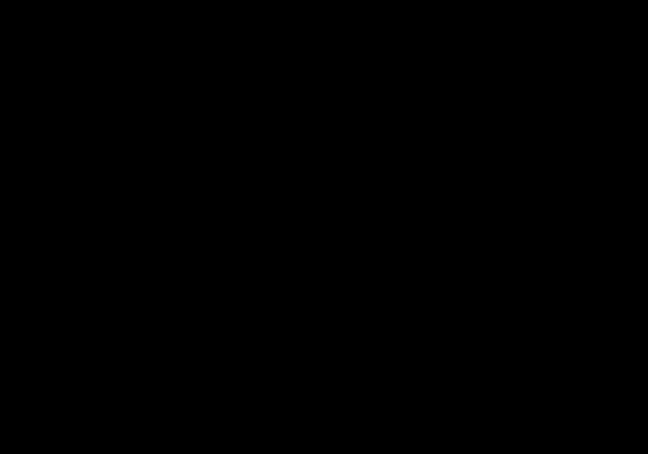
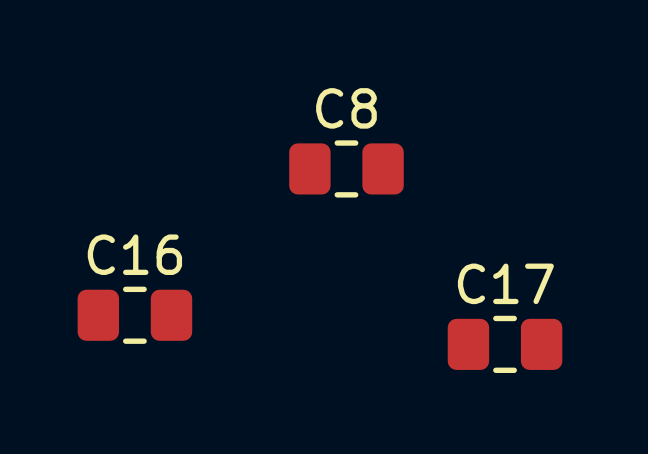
C8: none -> (346, 168)
C16: none -> (134, 315)
C17: none -> (505, 344)

